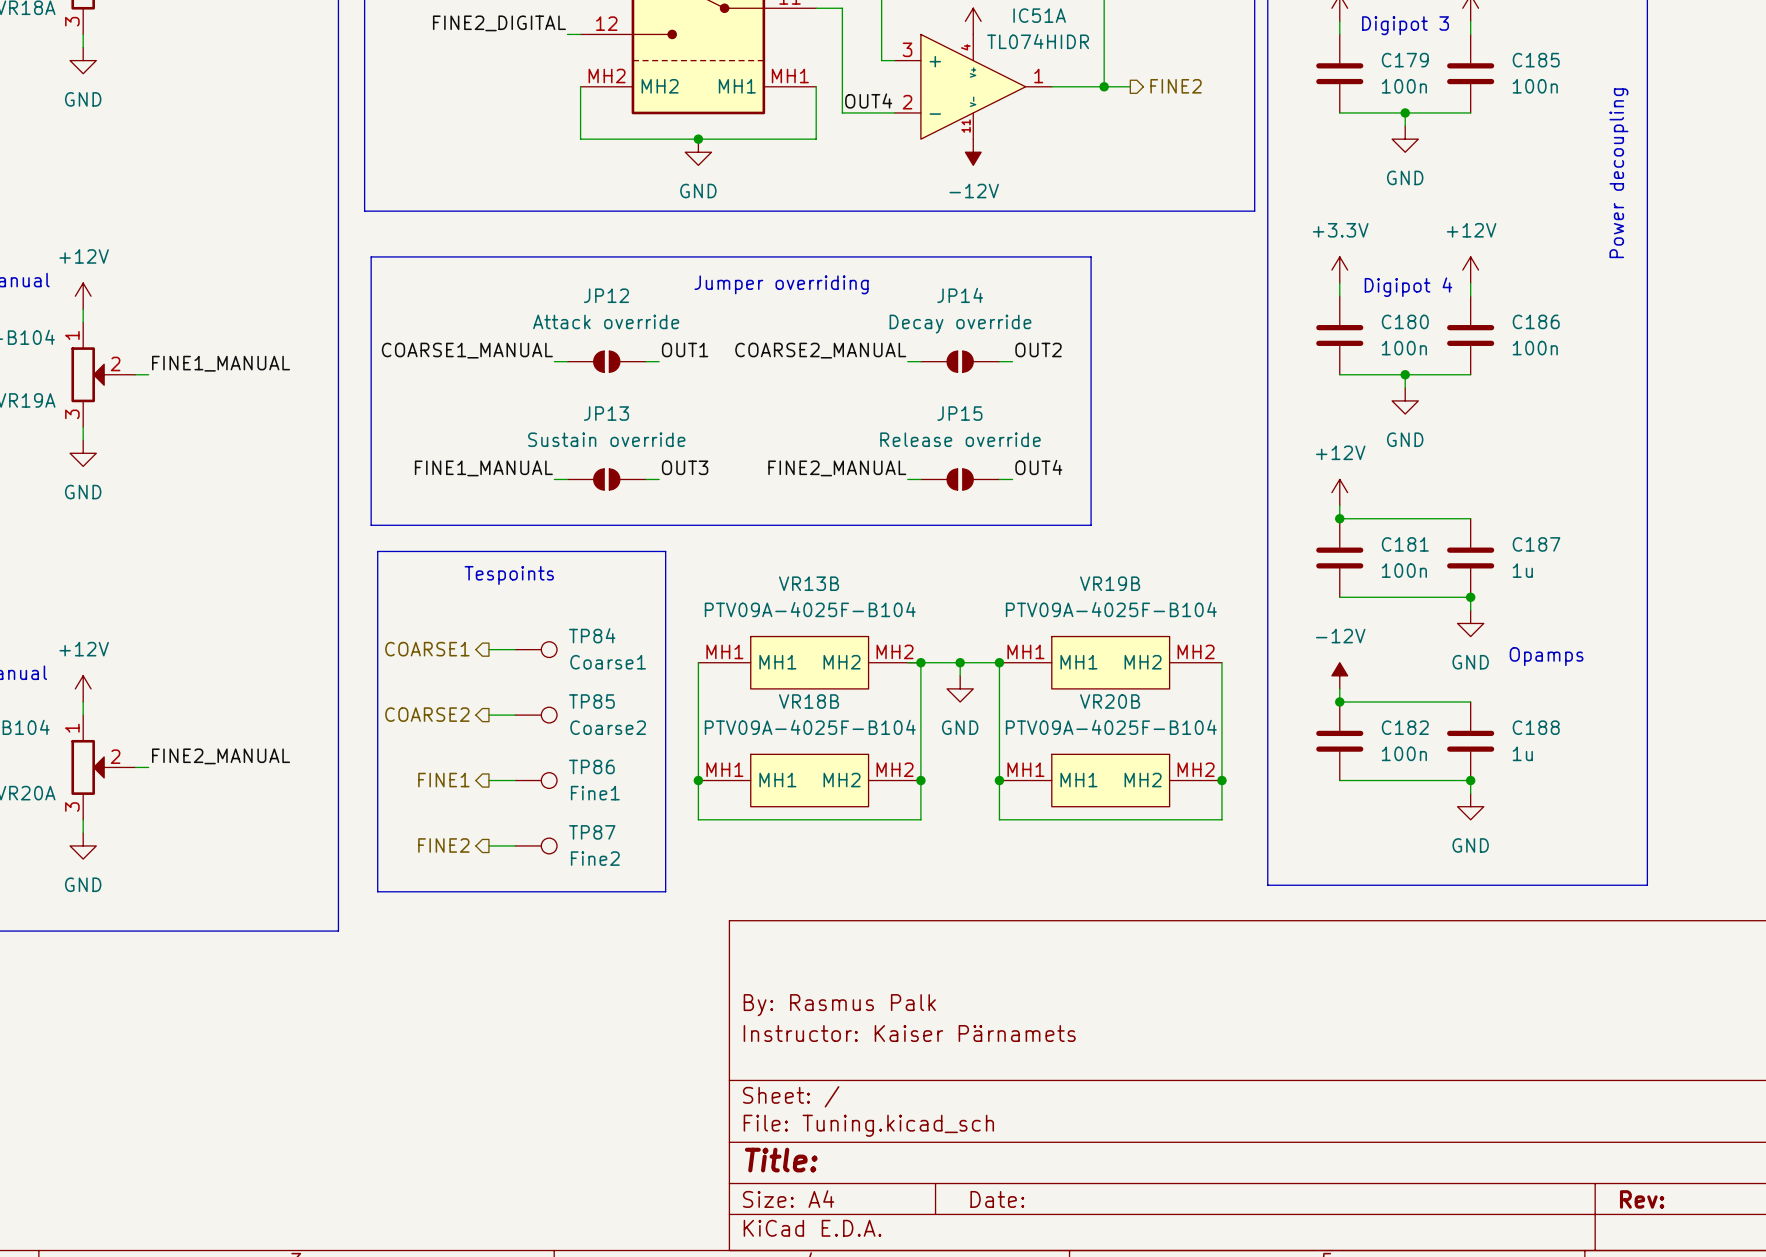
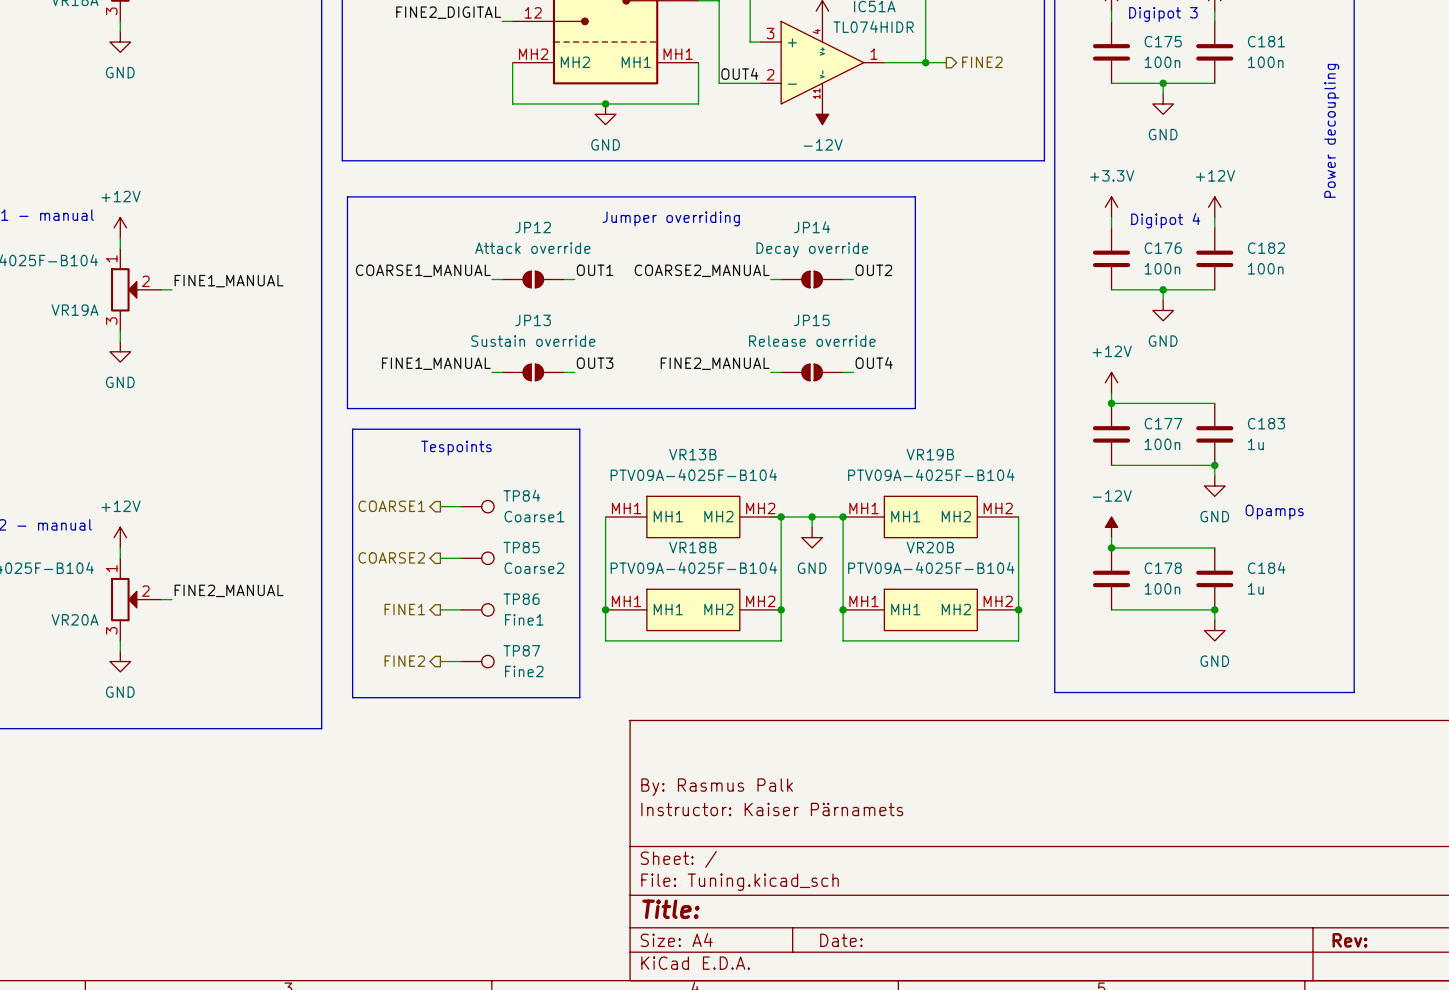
C179 name: C179 (1405, 60) -> C175 (1163, 41)
C185 name: C185 (1536, 60) -> C181 (1266, 41)
C180 name: C180 (1405, 321) -> C176 (1163, 248)
C186 name: C186 (1536, 321) -> C182 (1266, 248)
C181 name: C181 (1405, 544) -> C177 (1163, 423)
C187 name: C187 (1536, 544) -> C183 (1266, 423)
C182 name: C182 (1405, 727) -> C178 (1163, 568)
C188 name: C188 (1536, 727) -> C184 (1266, 567)

